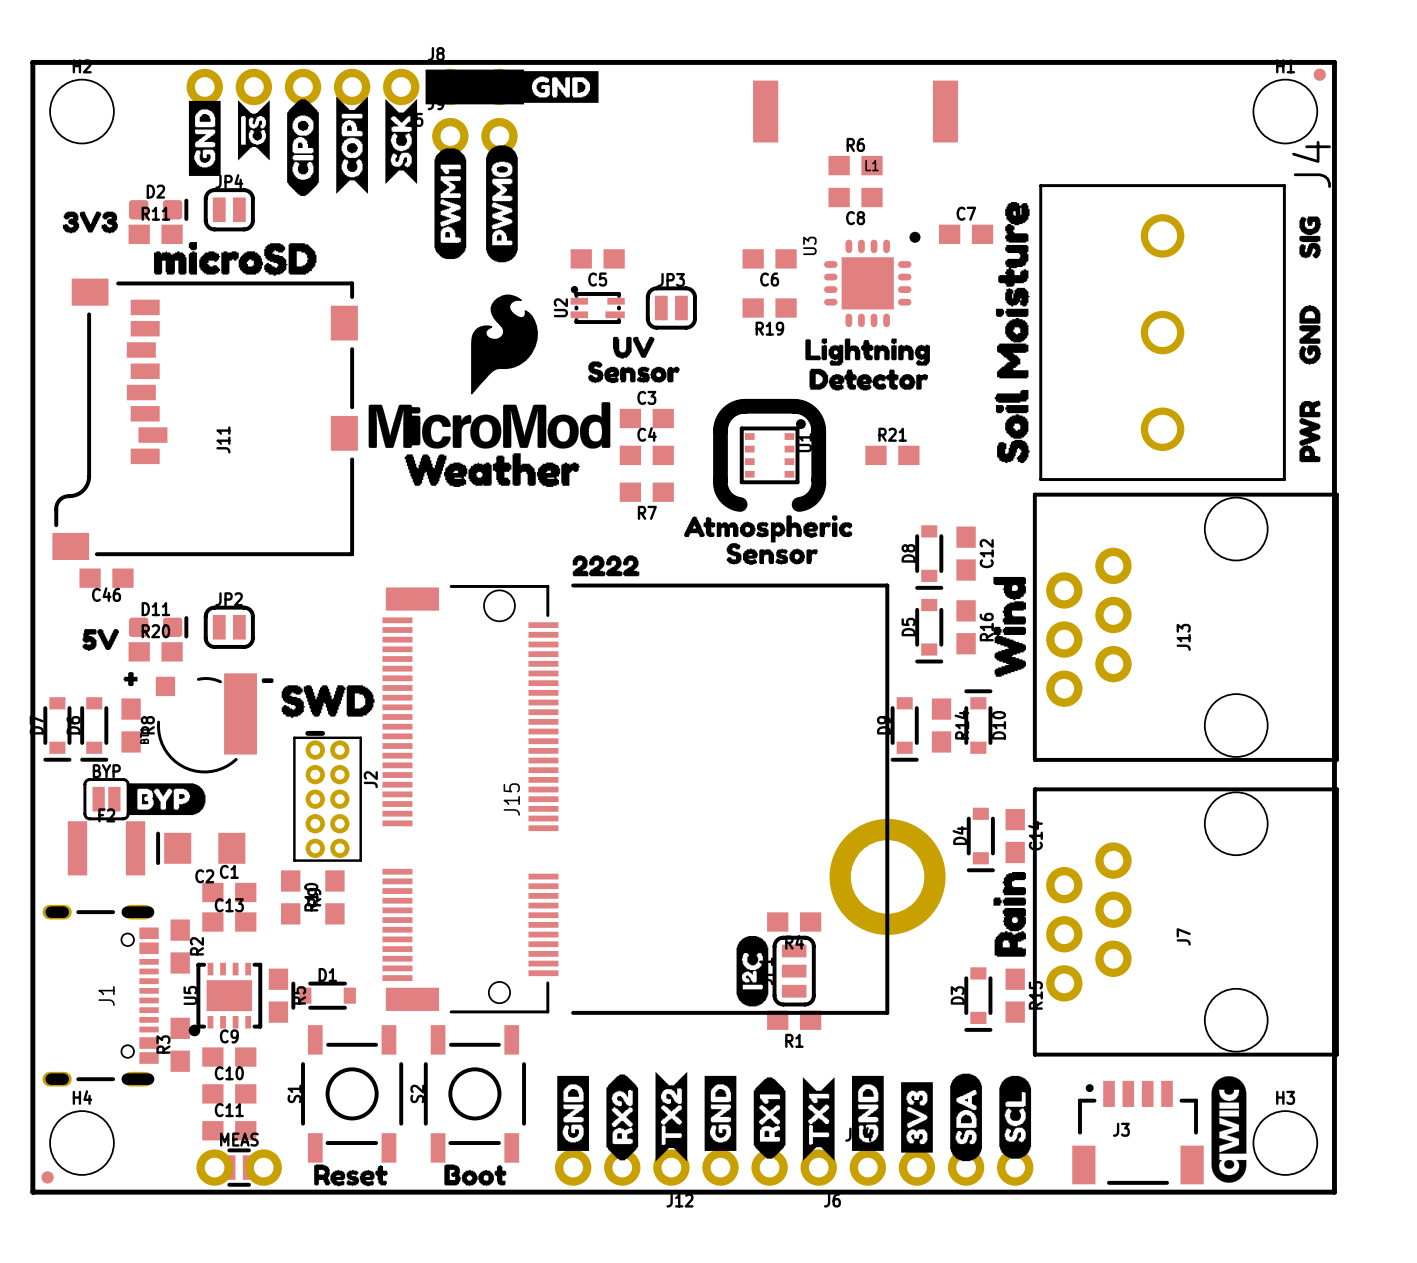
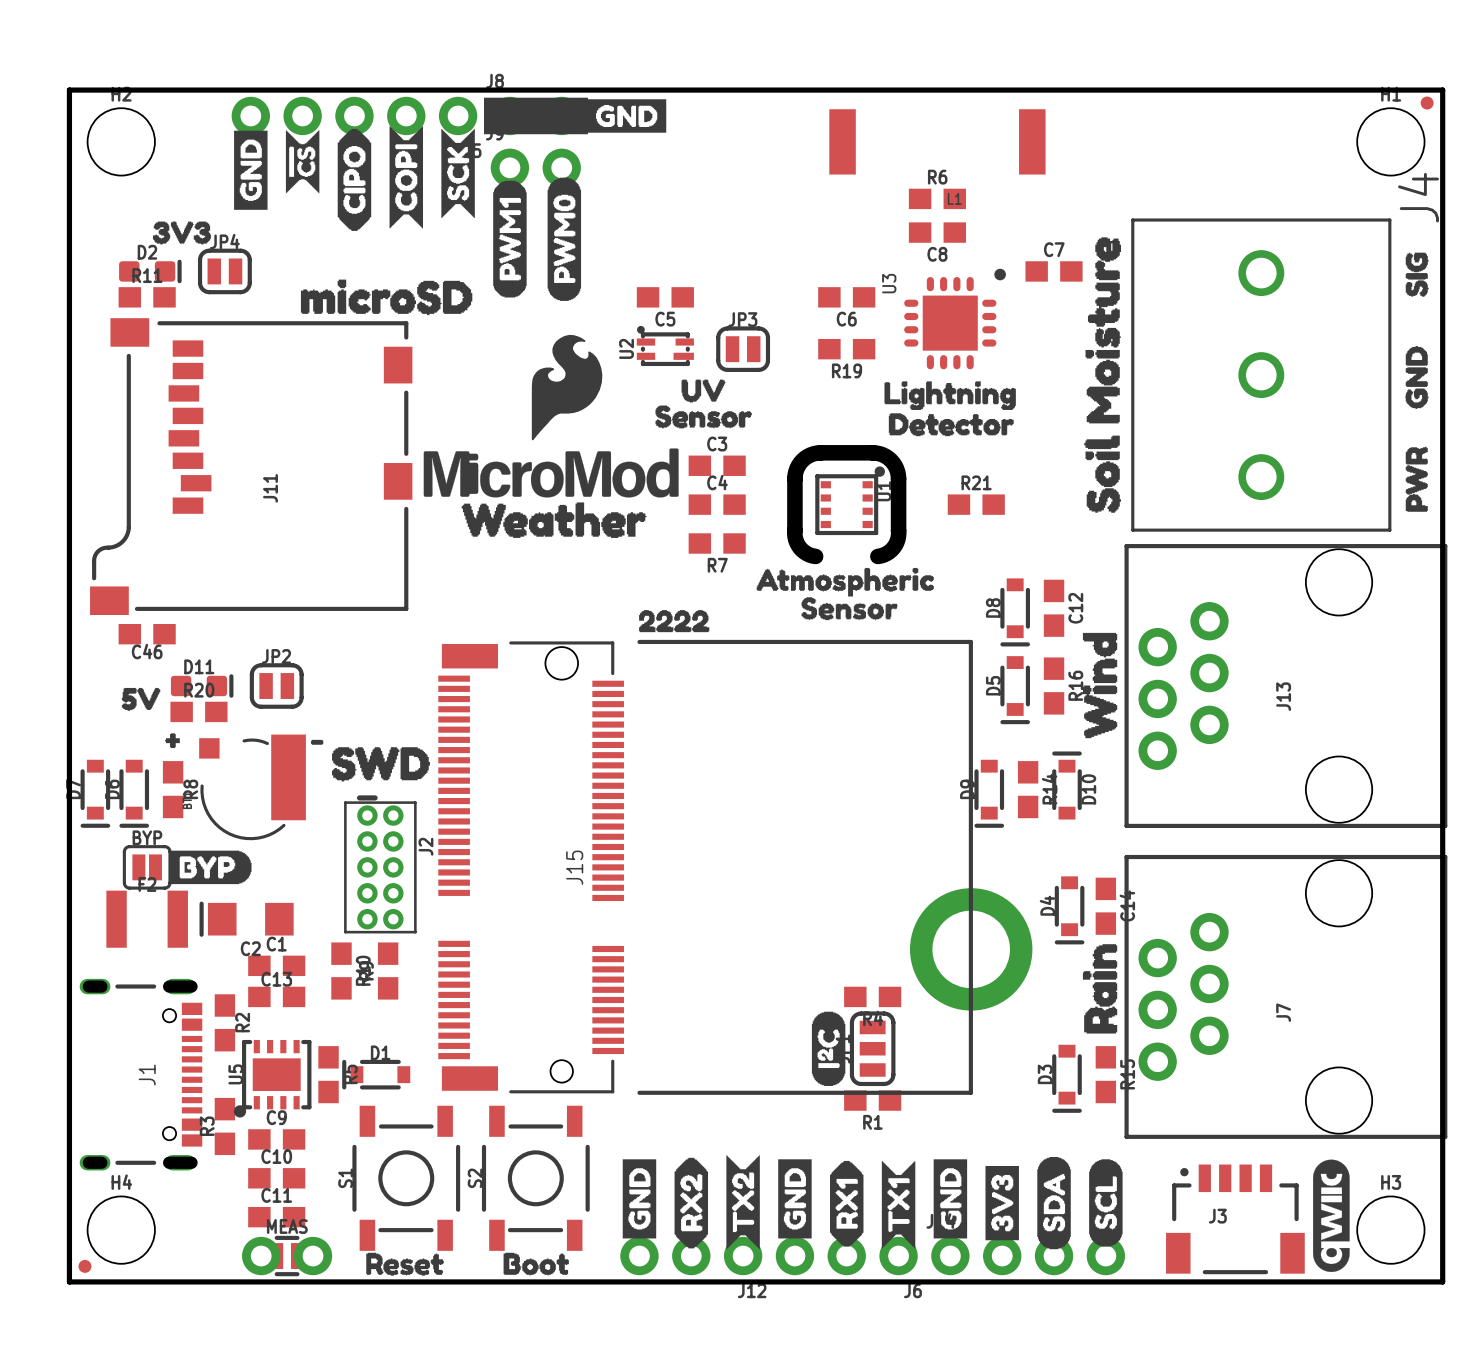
D2 position: (158, 209) -> (150, 271)
JP4 position: (229, 209) -> (224, 271)
drawing position: (90, 222) -> (181, 232)
R11 position: (155, 234) -> (147, 297)
drawing position: (235, 258) -> (386, 297)

